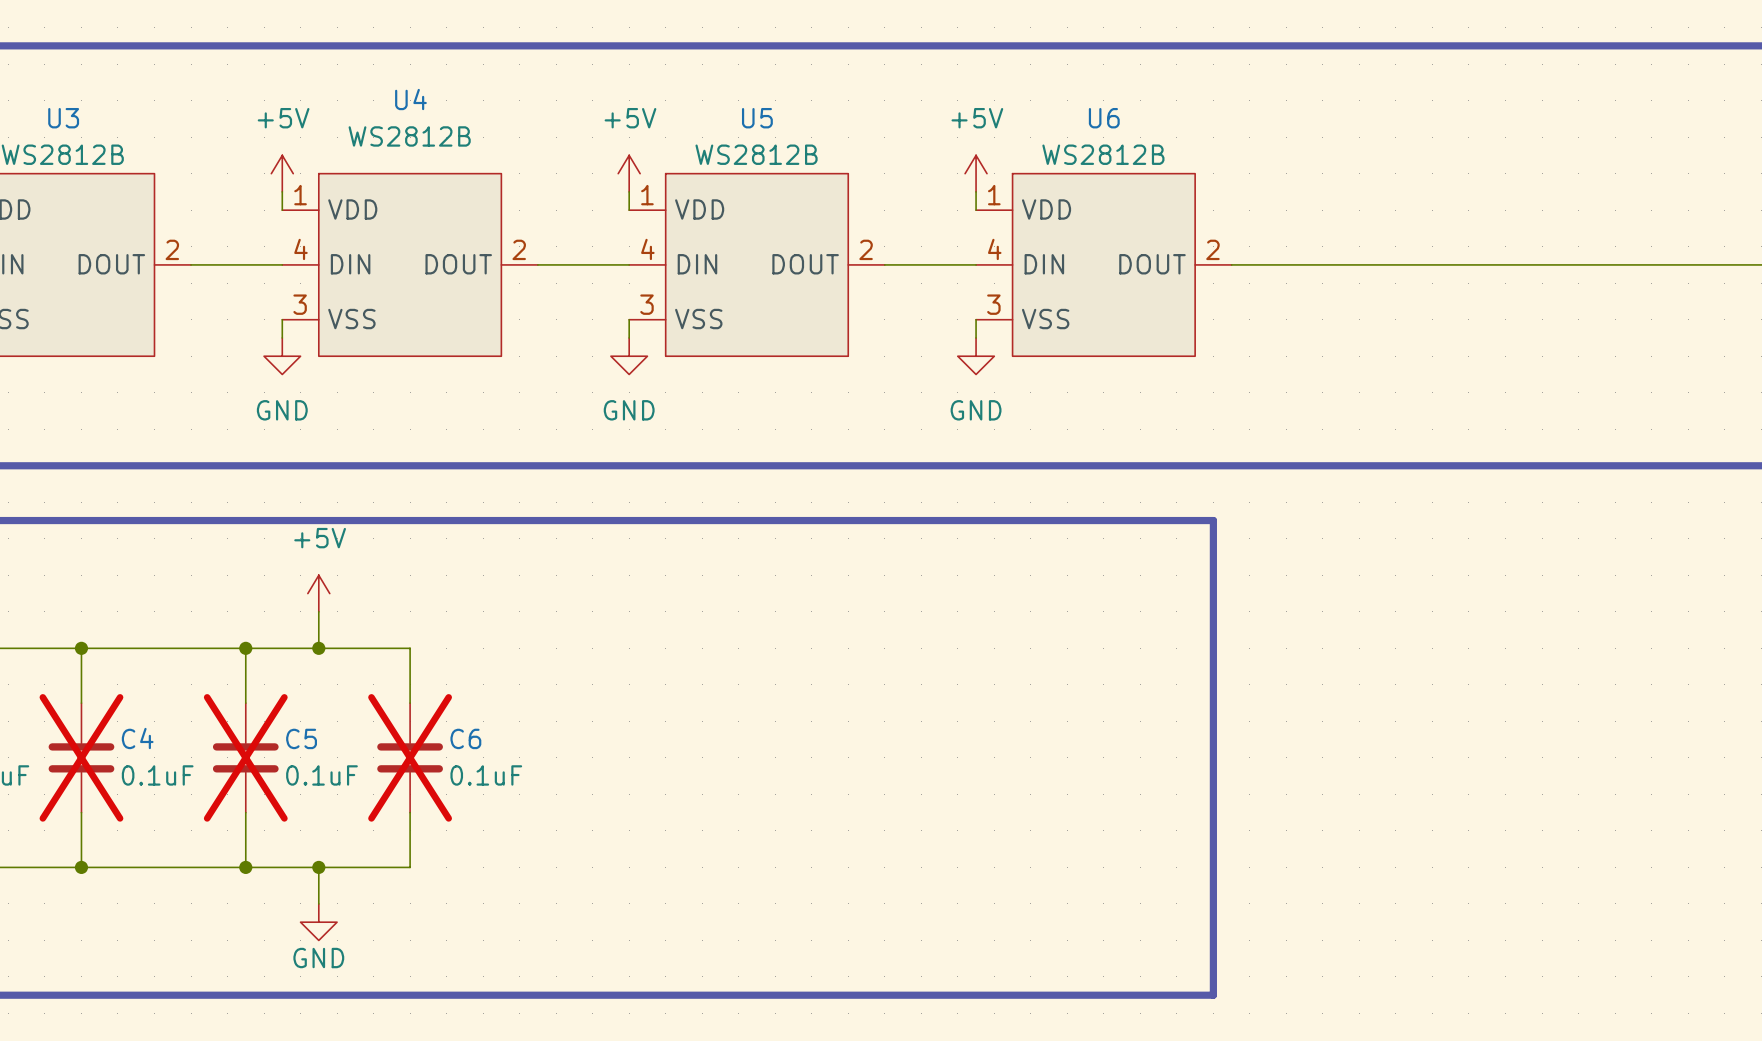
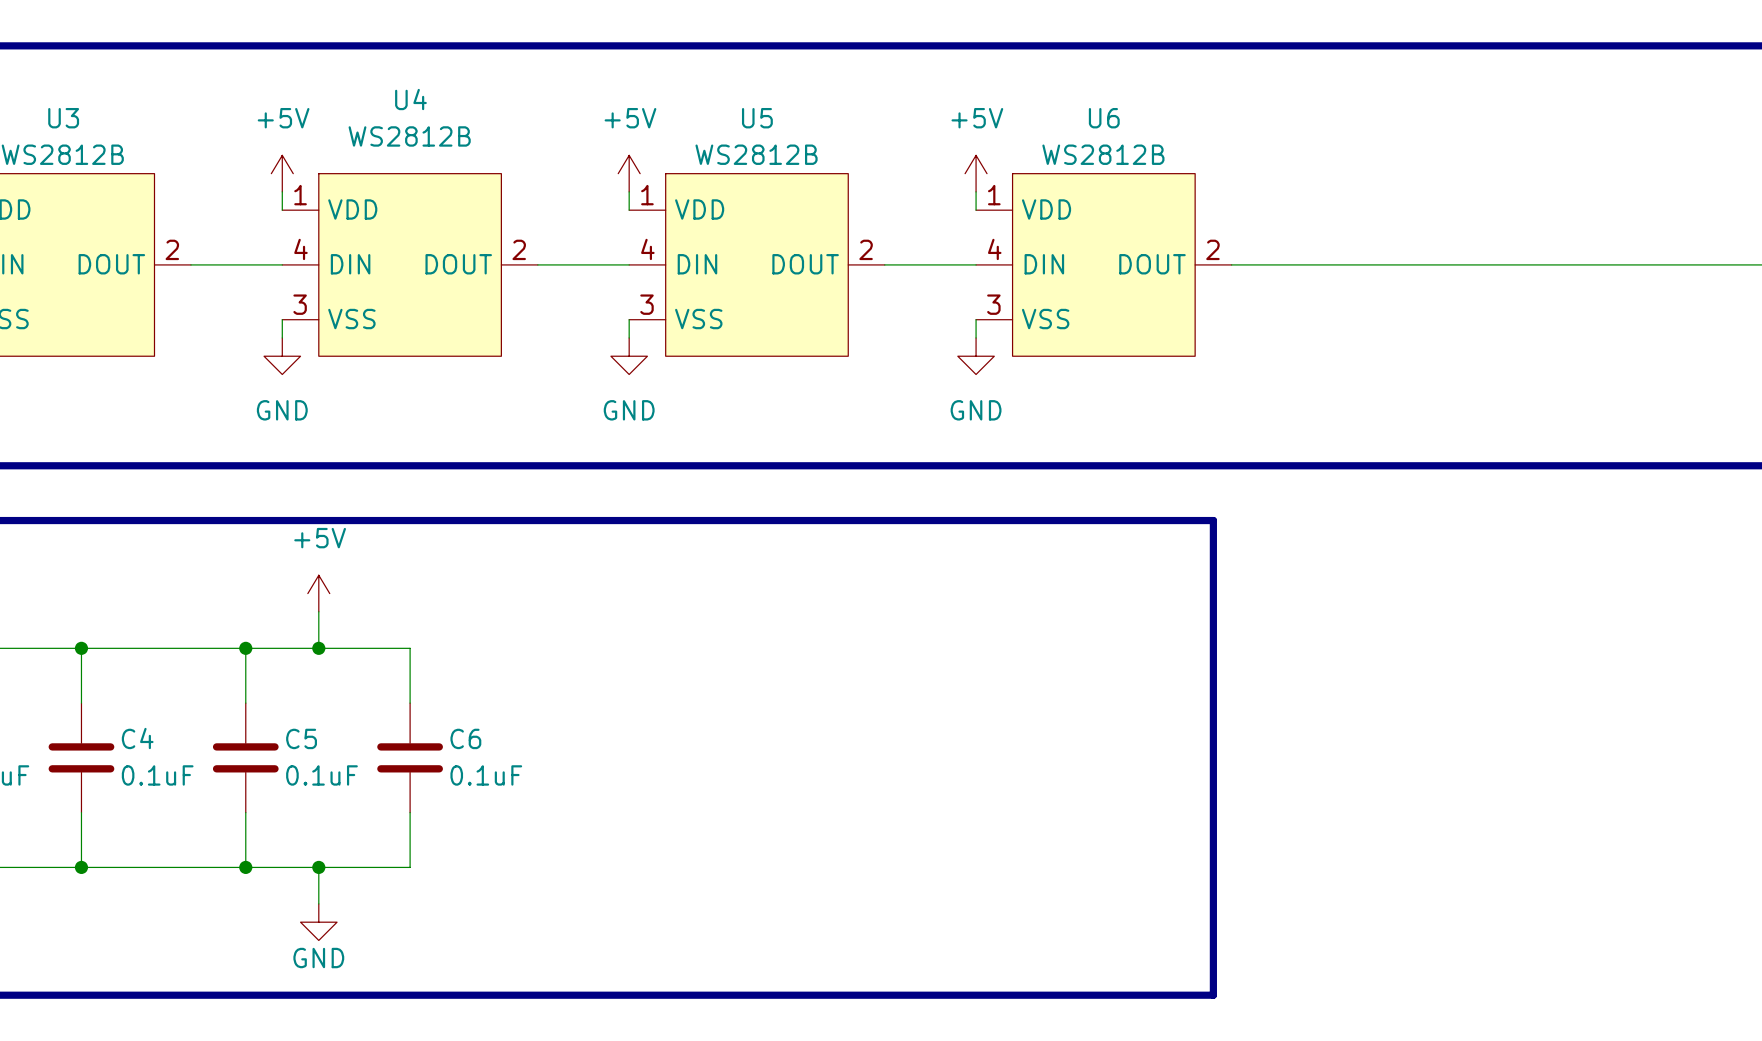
C4 do-not-place cross: (81, 757) -> none
C5 do-not-place cross: (245, 757) -> none
C6 do-not-place cross: (410, 757) -> none

